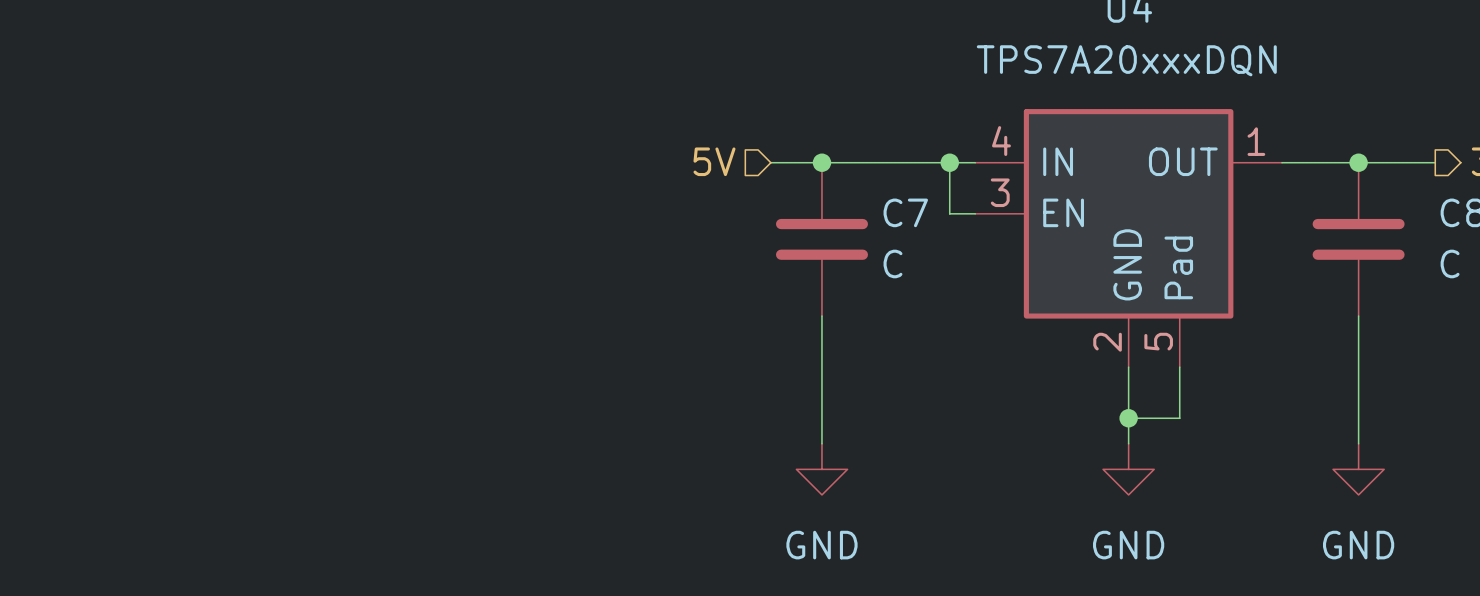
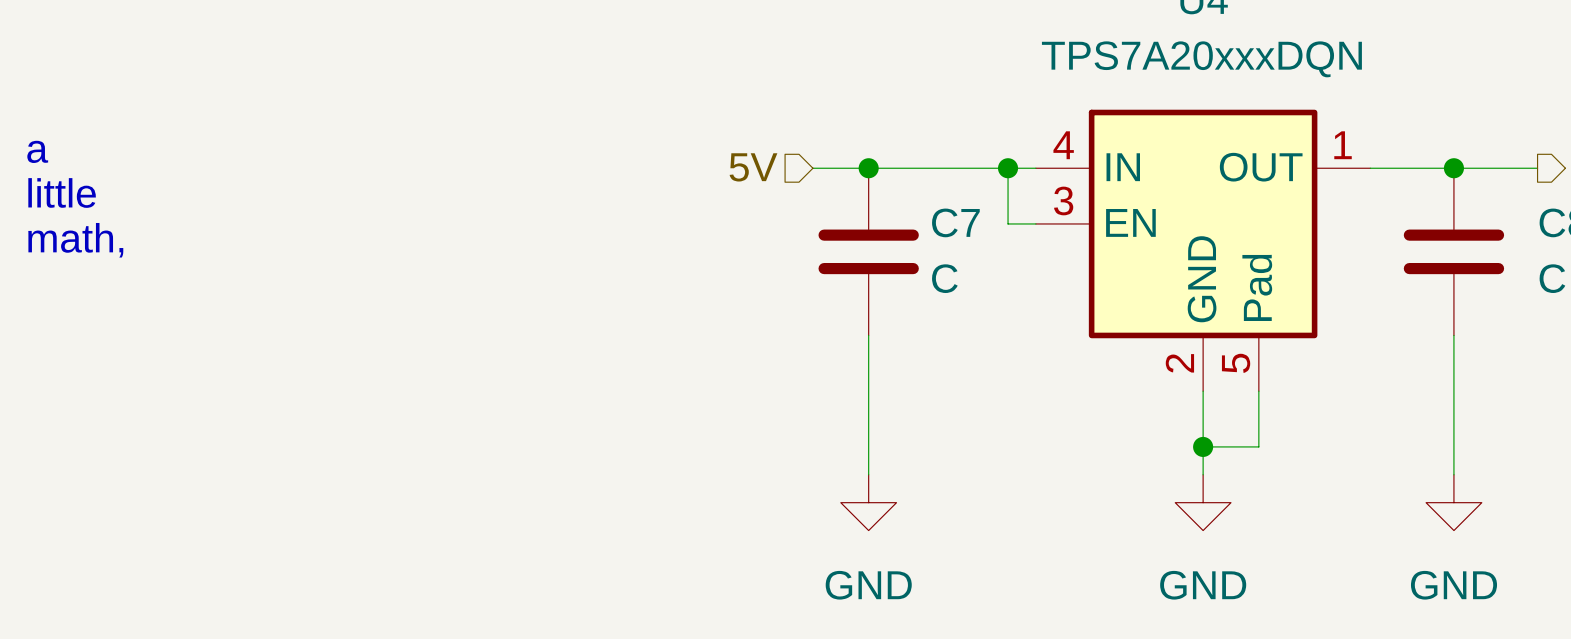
text: none -> a (37, 151)
text: none -> little (62, 192)
text: none -> math, (75, 240)

